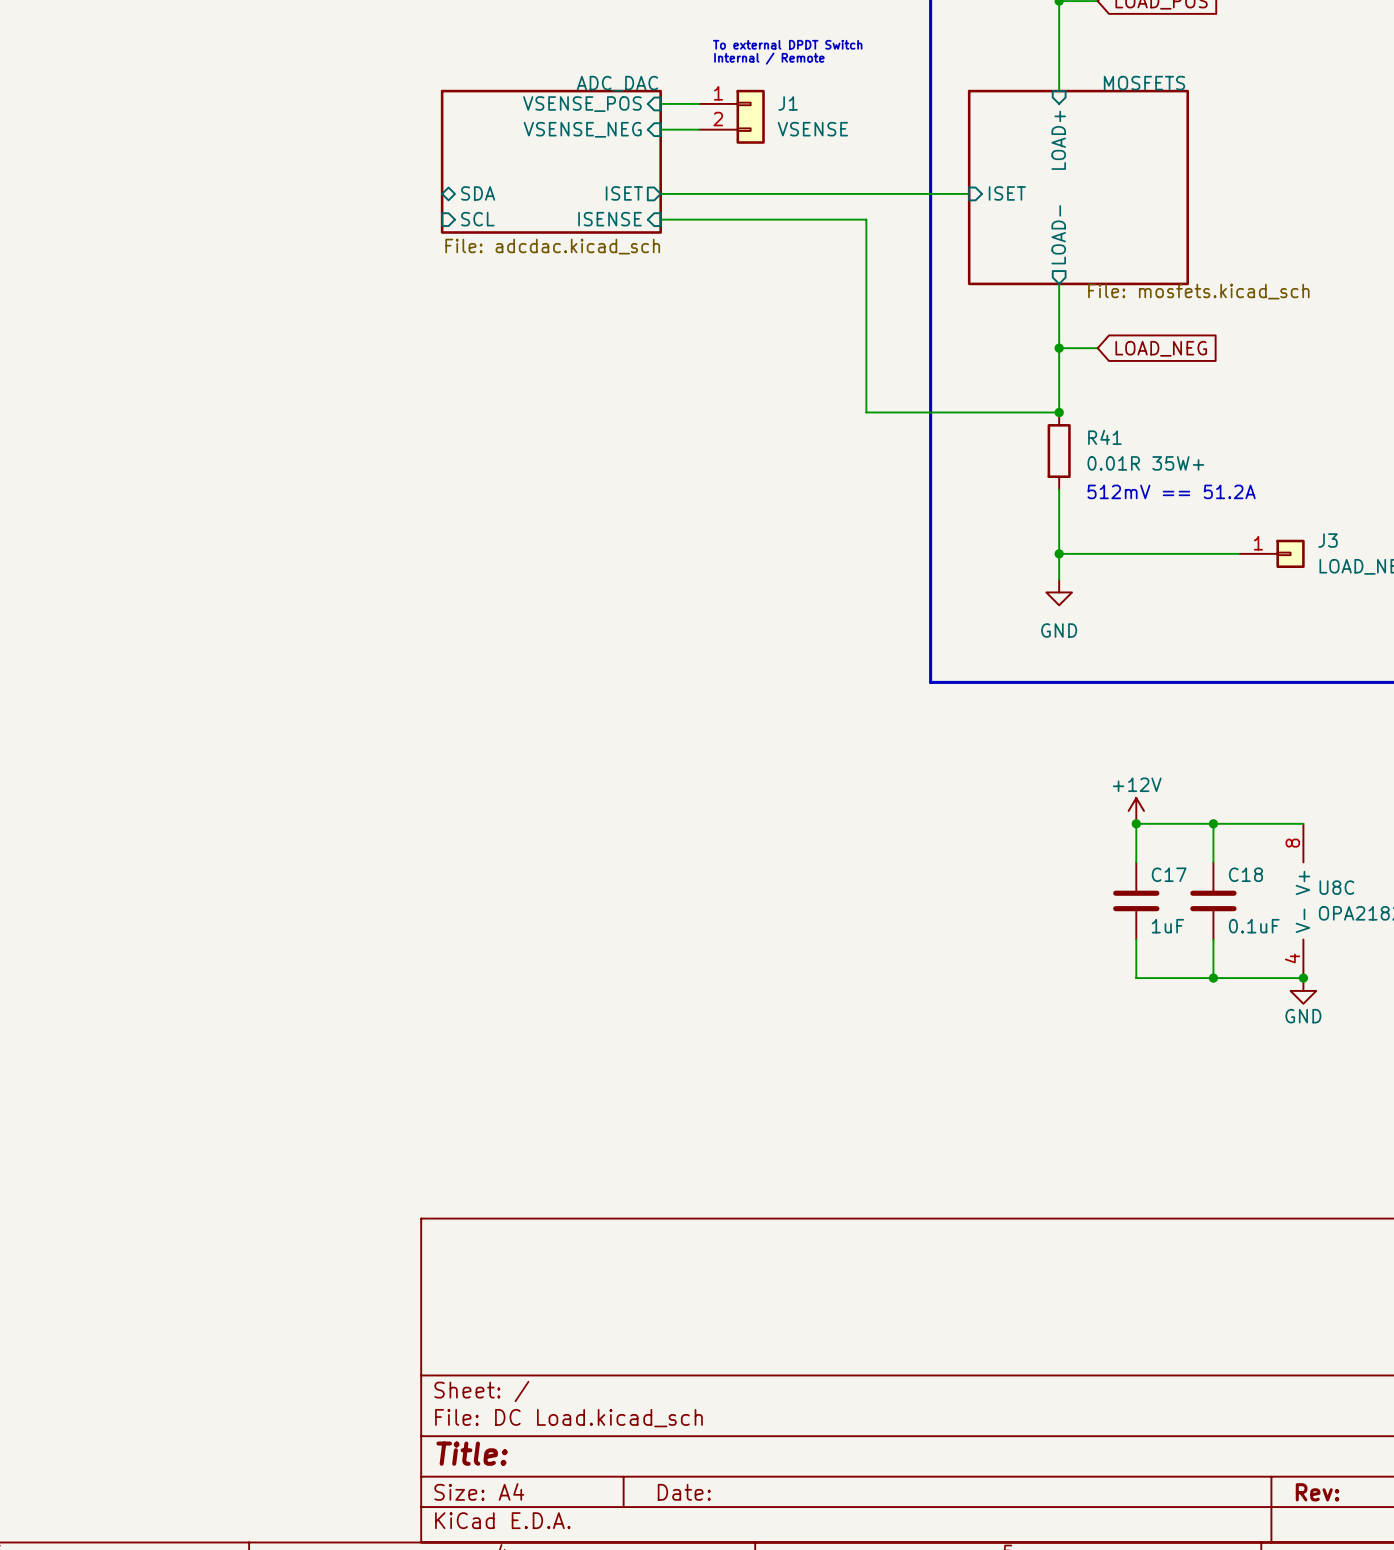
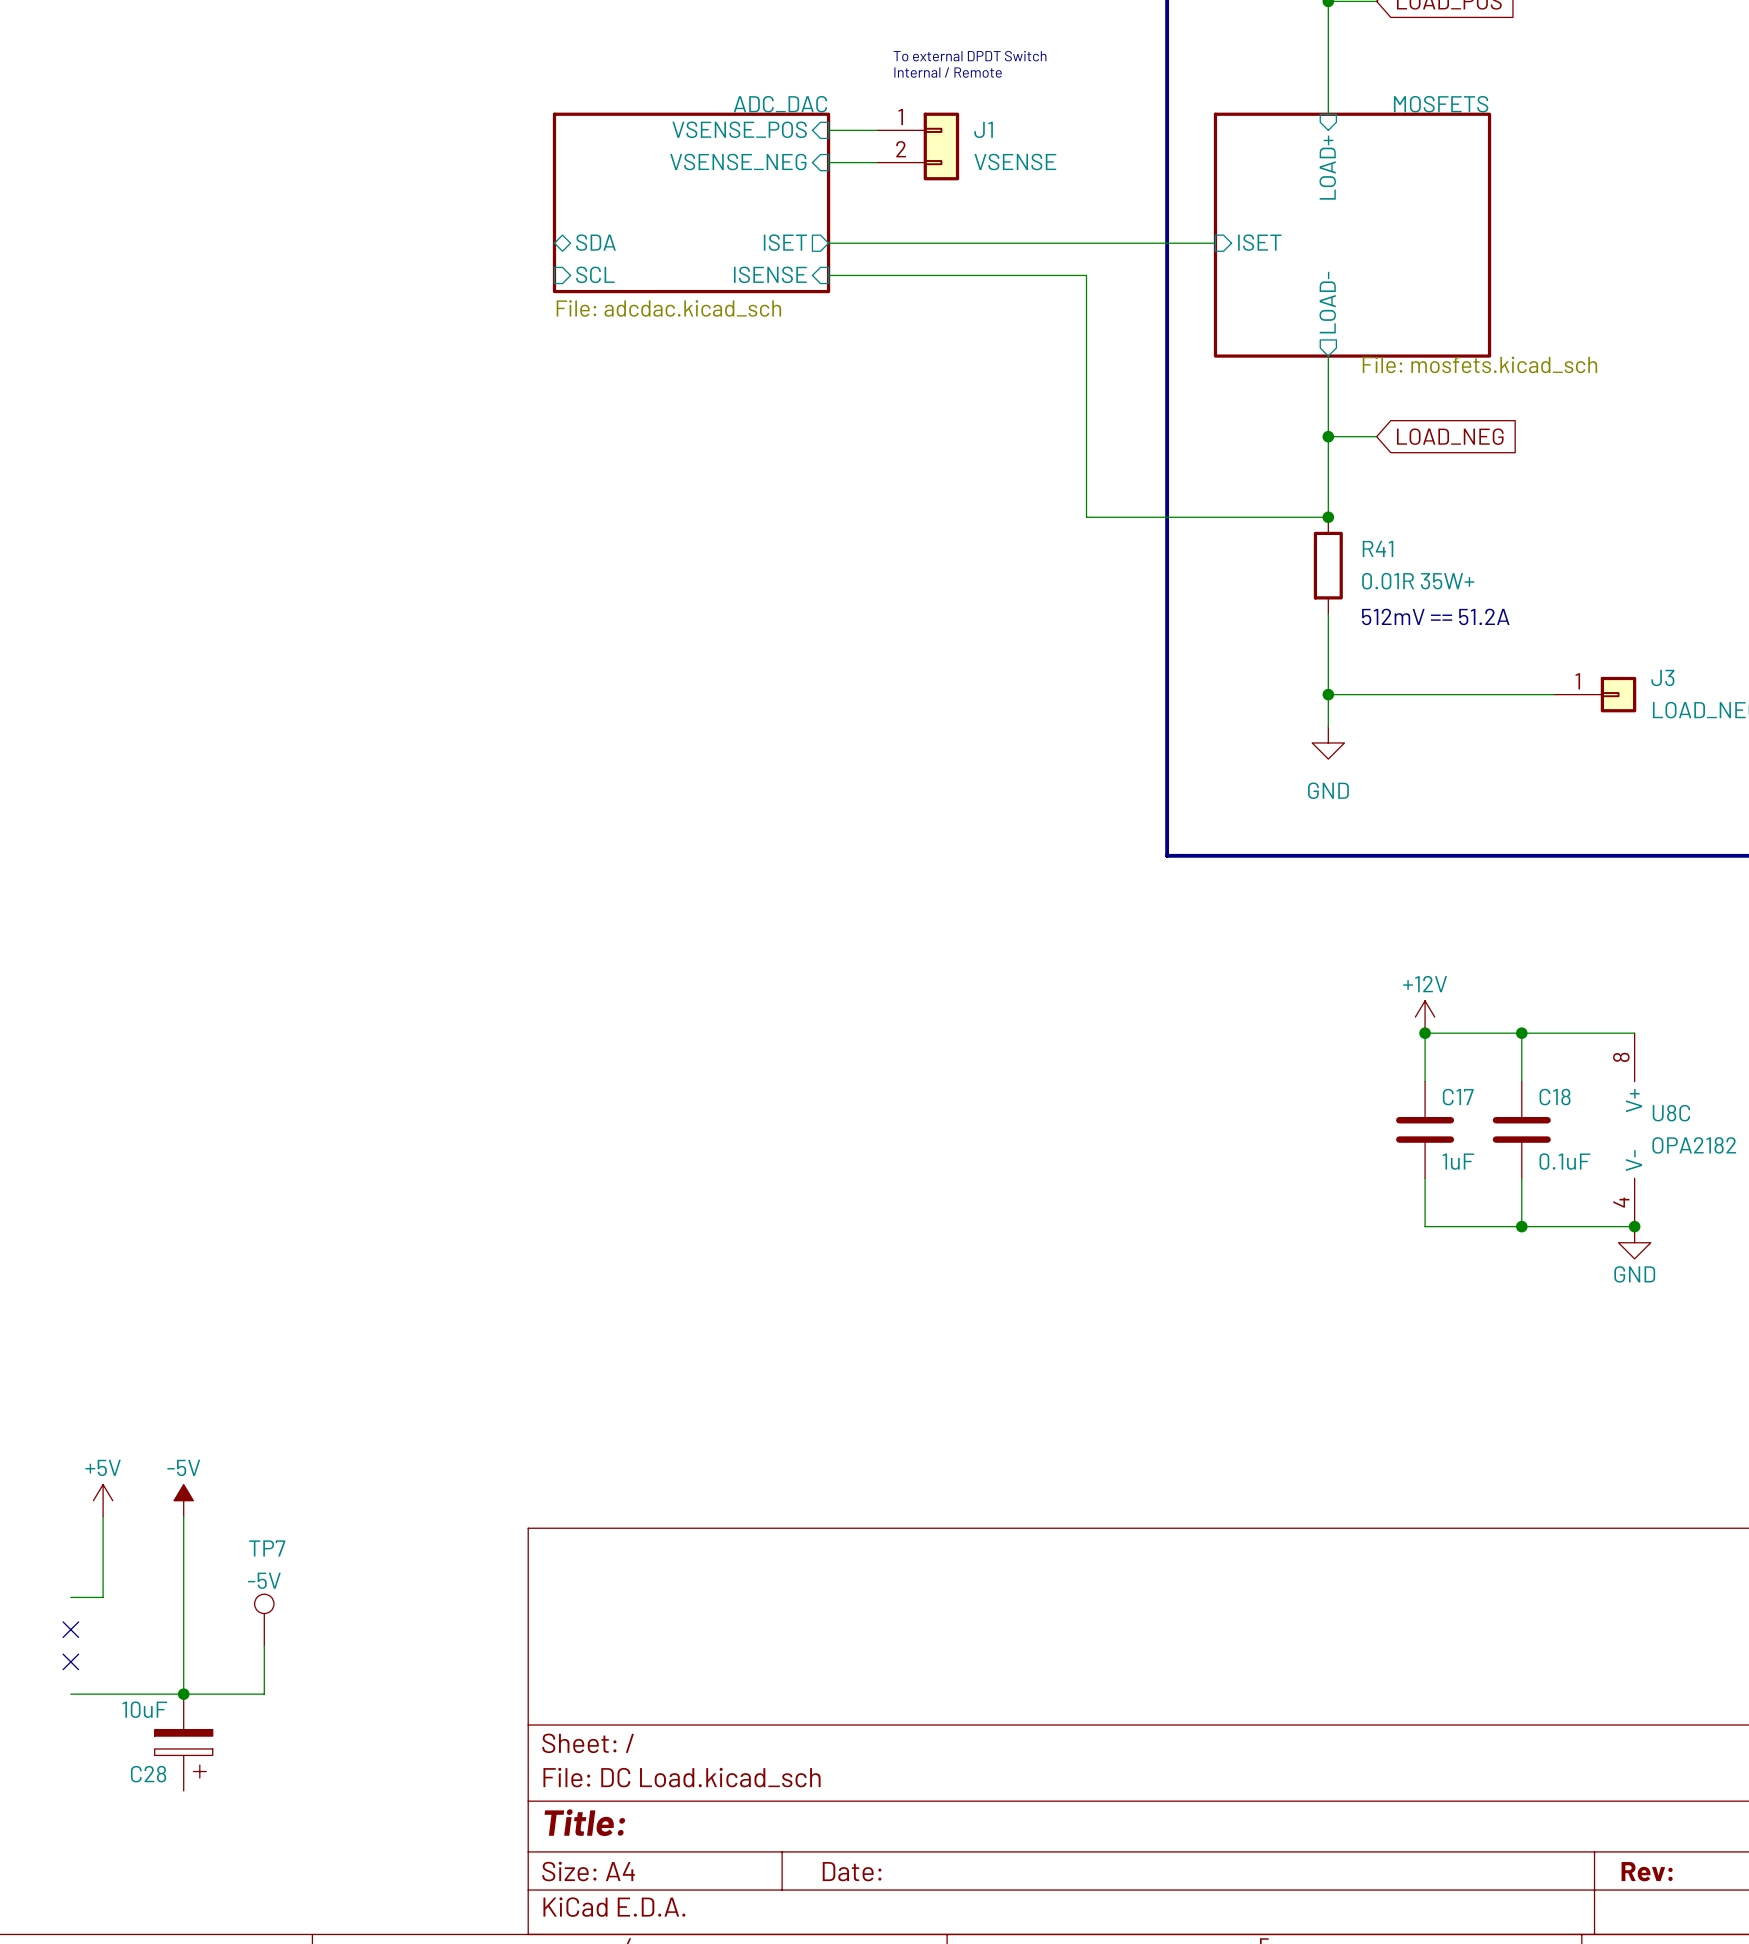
power symbol: none -> +5V (103, 1500)
power symbol: none -> -5V (183, 1500)
wire: none -> (103, 1516) (103, 1597) (70, 1597)
wire: none -> (183, 1516) (183, 1694)
TP7: none -> -5V (264, 1620)
no-connect mark: none -> (70, 1629)
wire: none -> (264, 1645) (264, 1694) (70, 1694)
no-connect mark: none -> (70, 1661)
junction: none -> (183, 1694)
C28: none -> 10uF (183, 1742)

